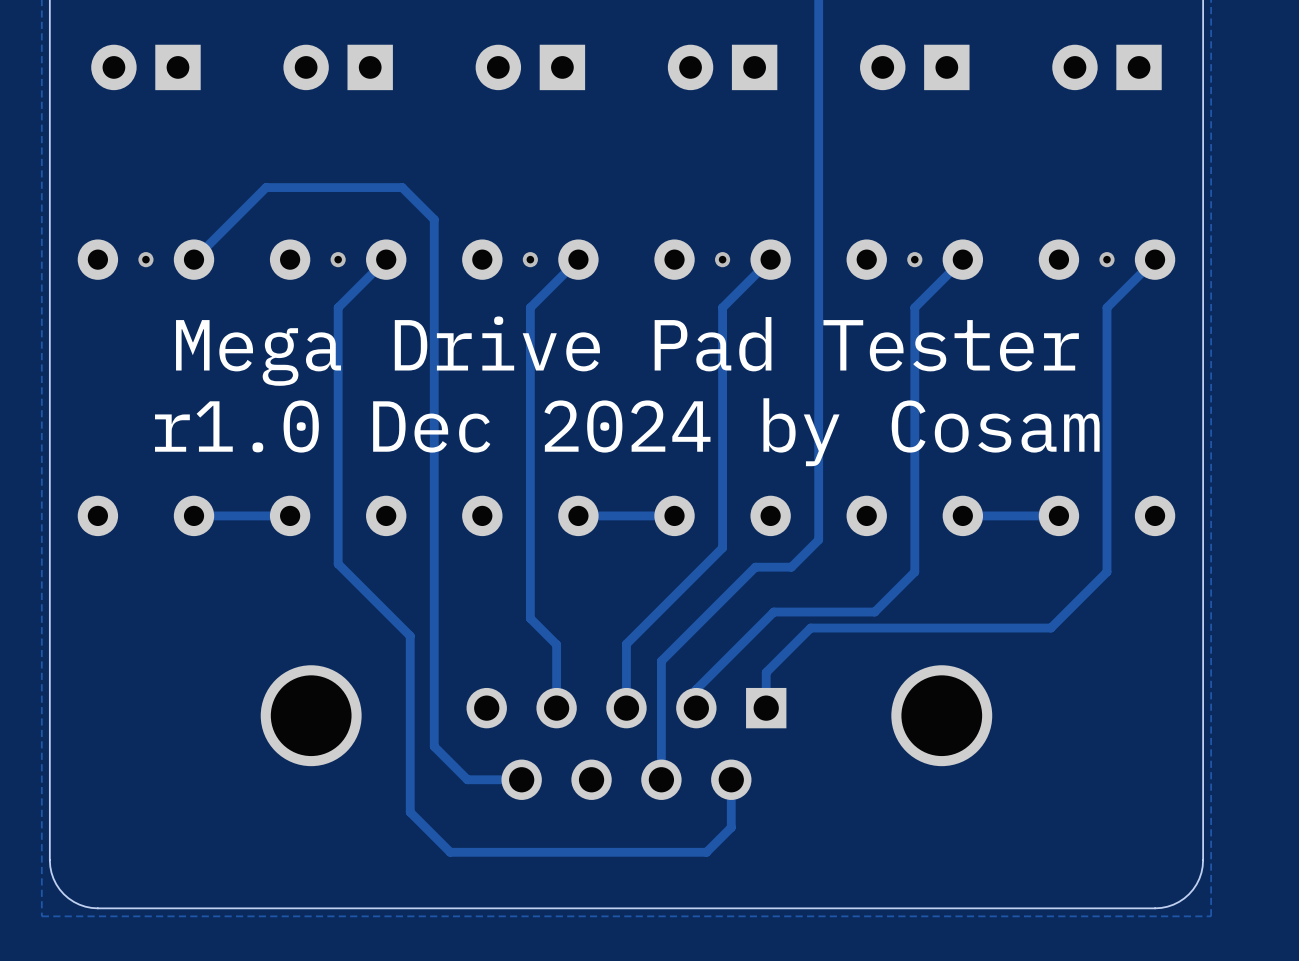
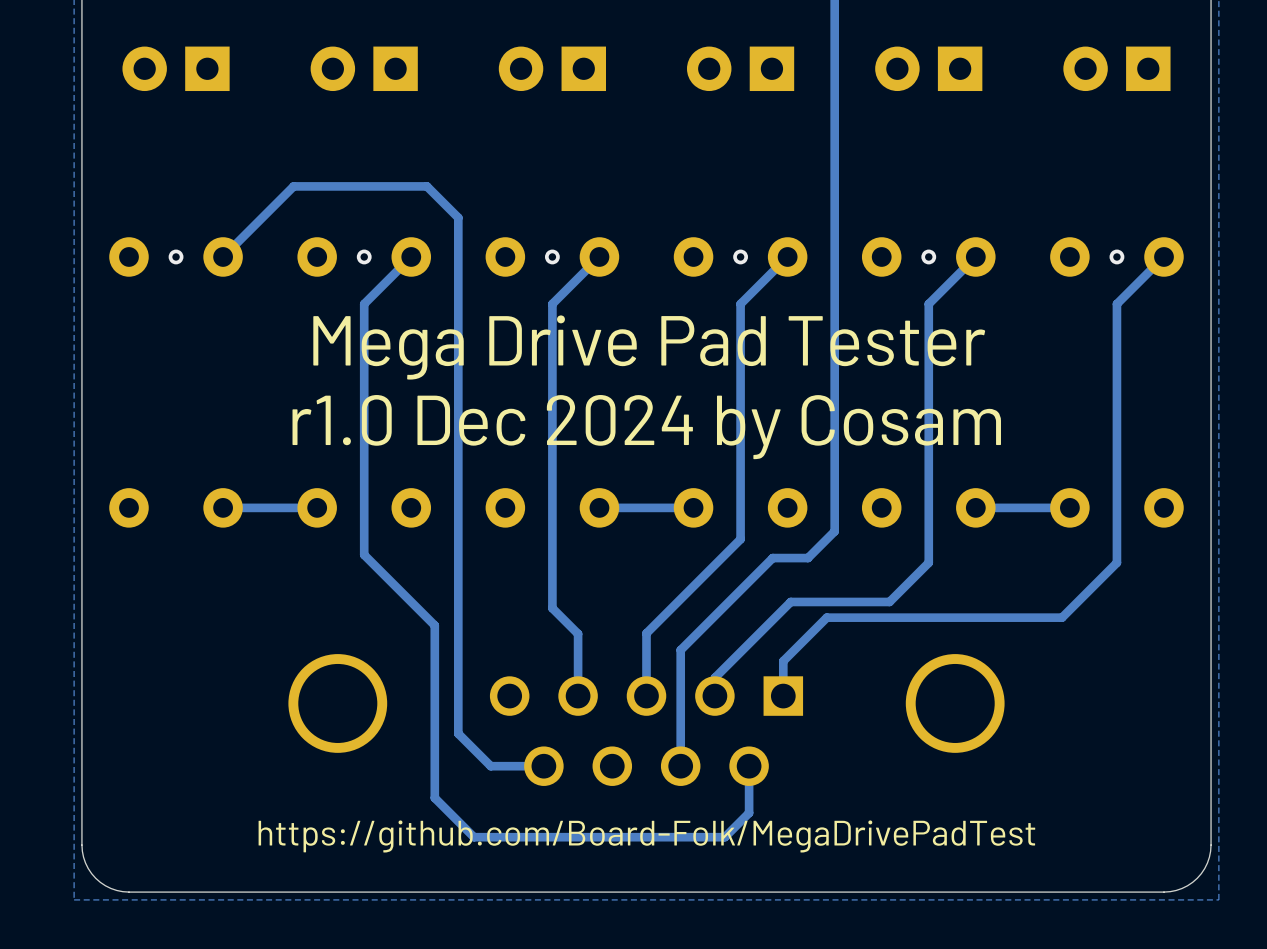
text: none -> https://github.com/Board-Folk/MegaDrivePadTest (646, 836)

